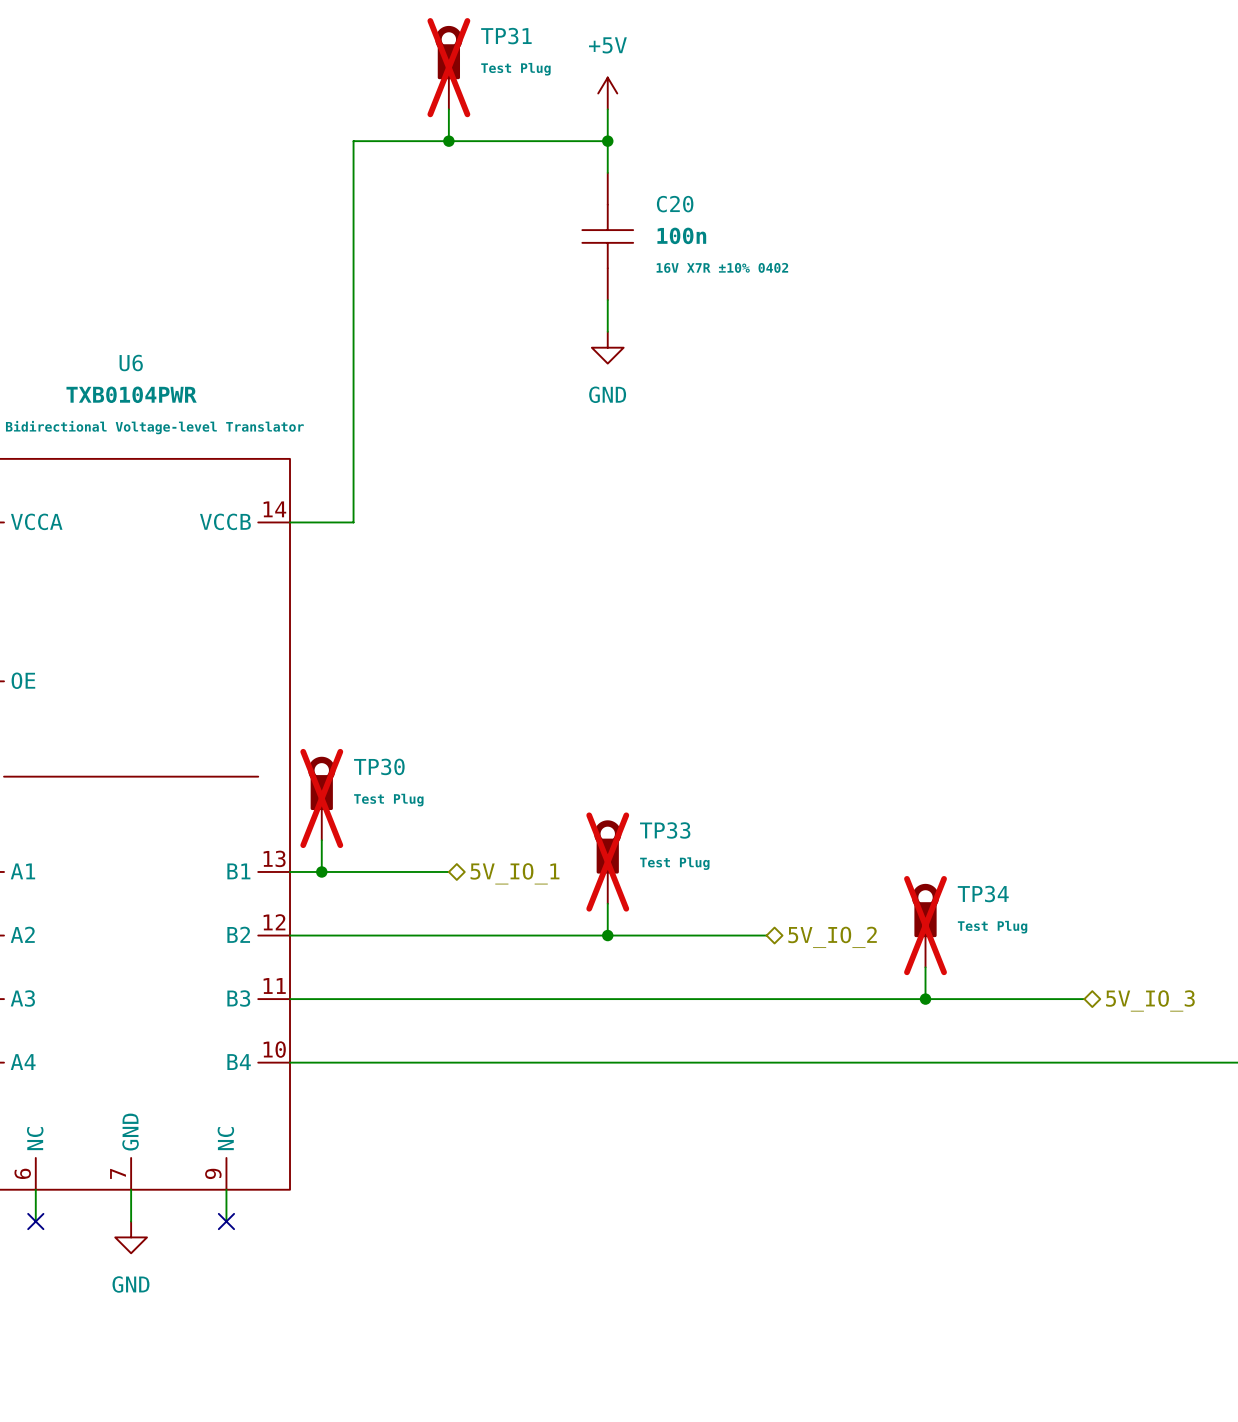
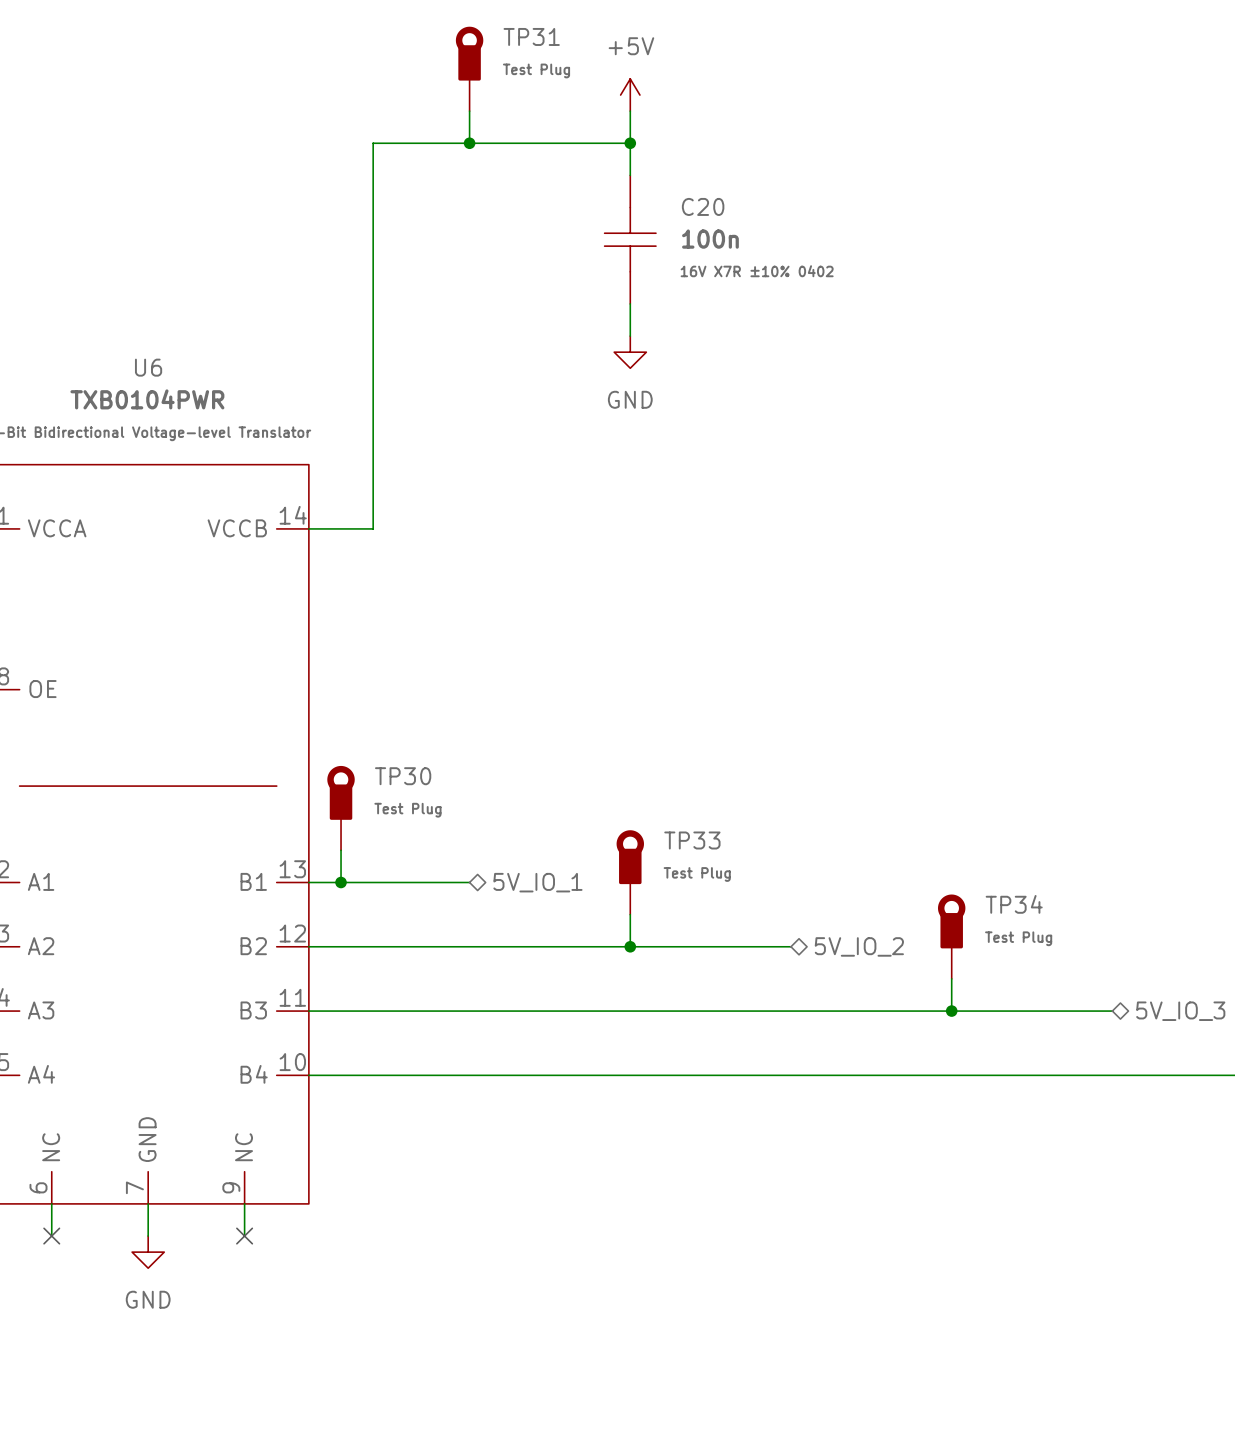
TP31 do-not-place cross: (448, 67) -> none
TP30 do-not-place cross: (321, 798) -> none
TP33 do-not-place cross: (607, 862) -> none
TP34 do-not-place cross: (925, 925) -> none

